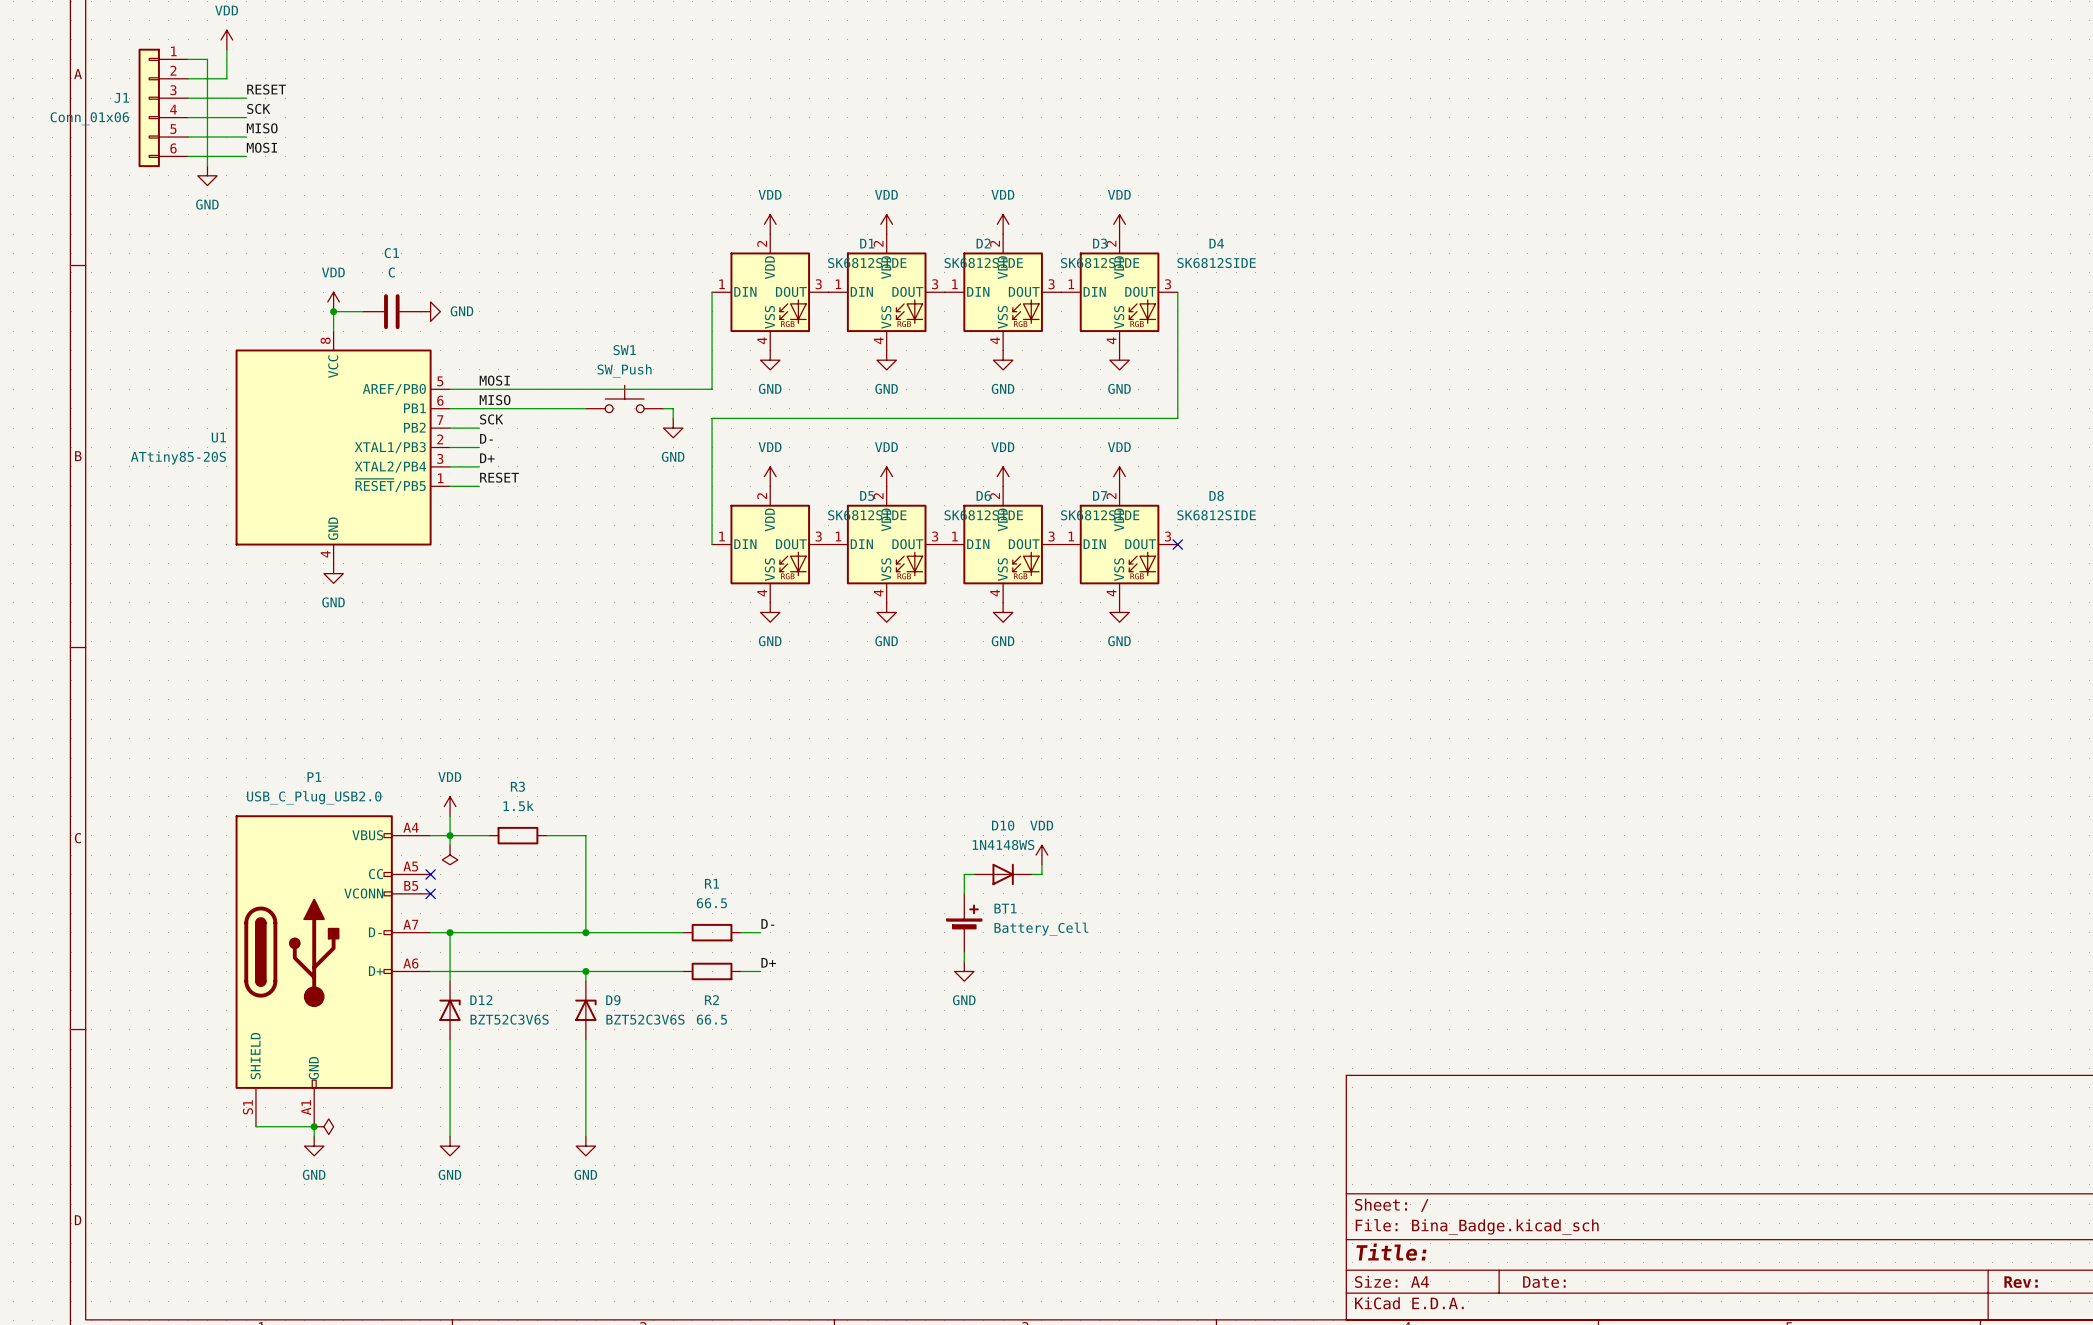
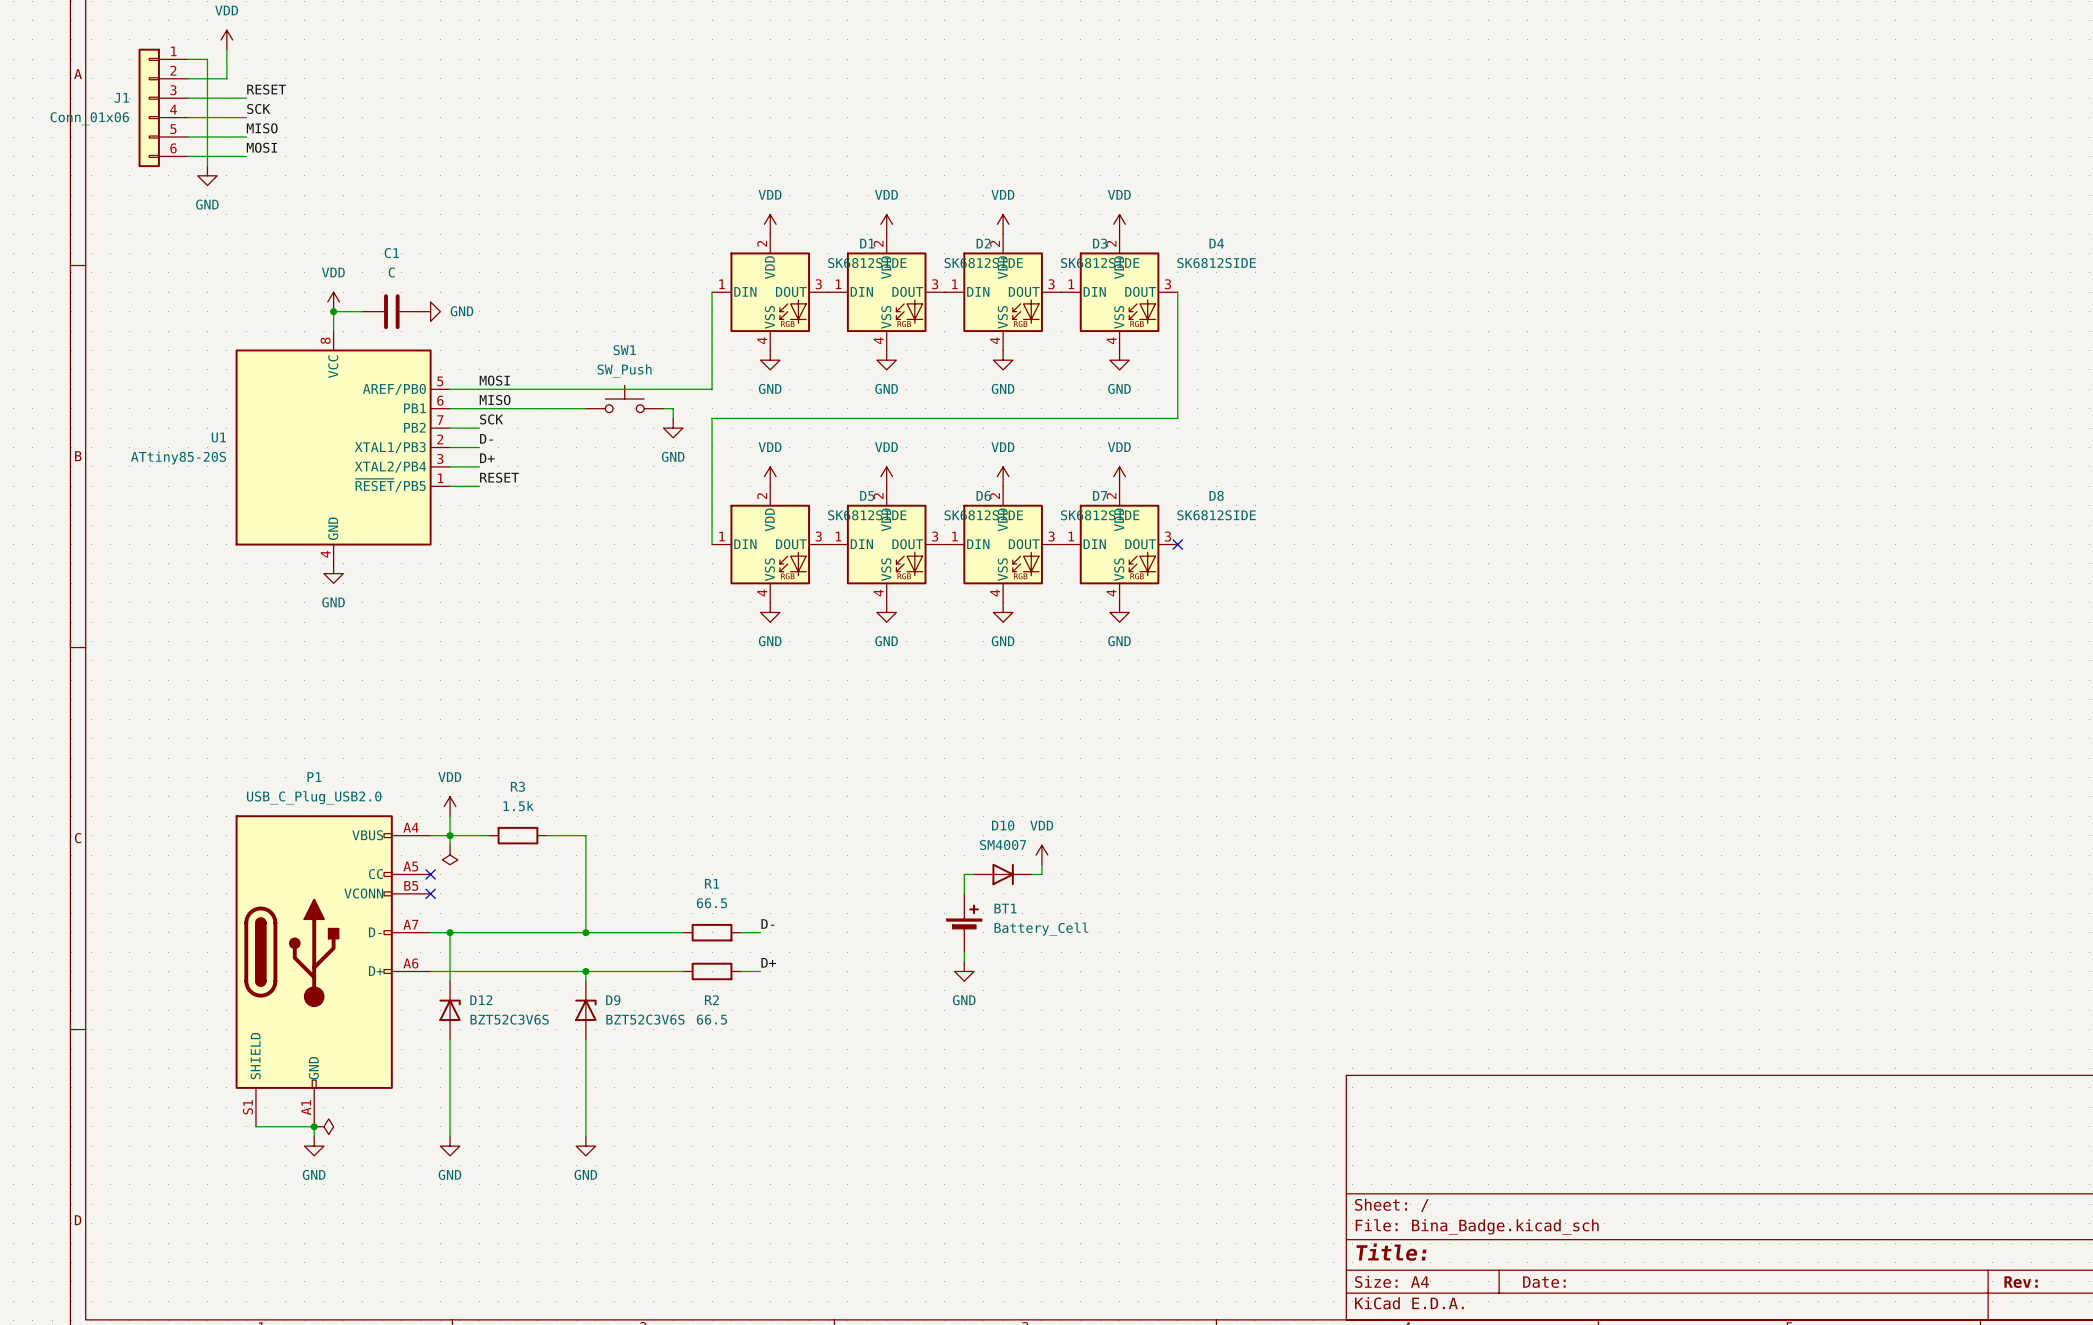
D10 value: 1N4148WS (1003, 844) -> SM4007 (1003, 844)

